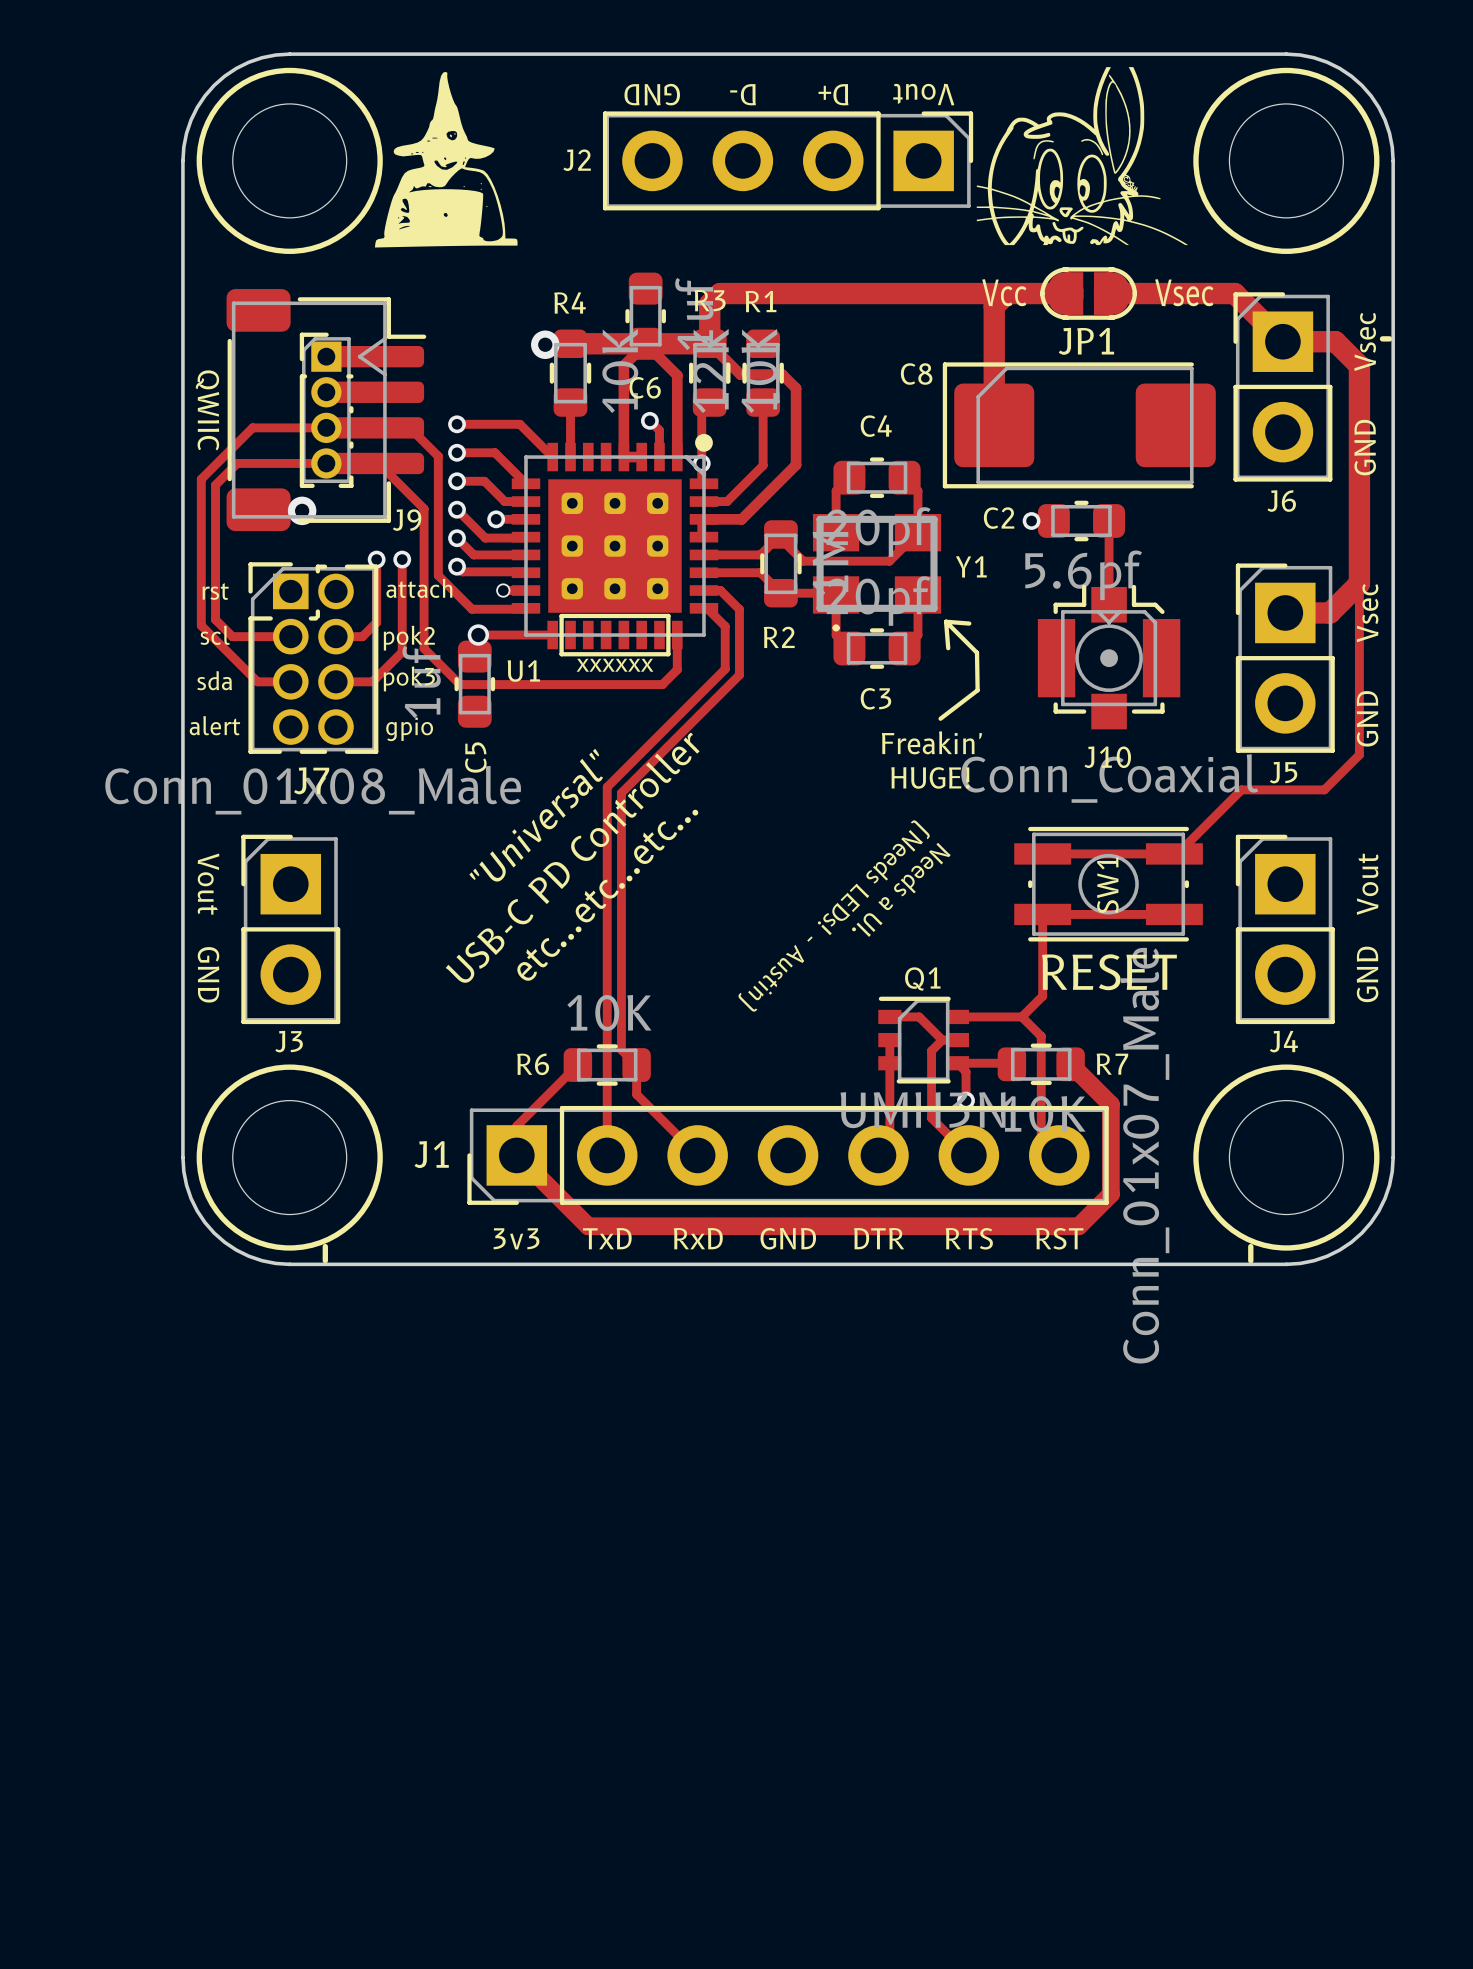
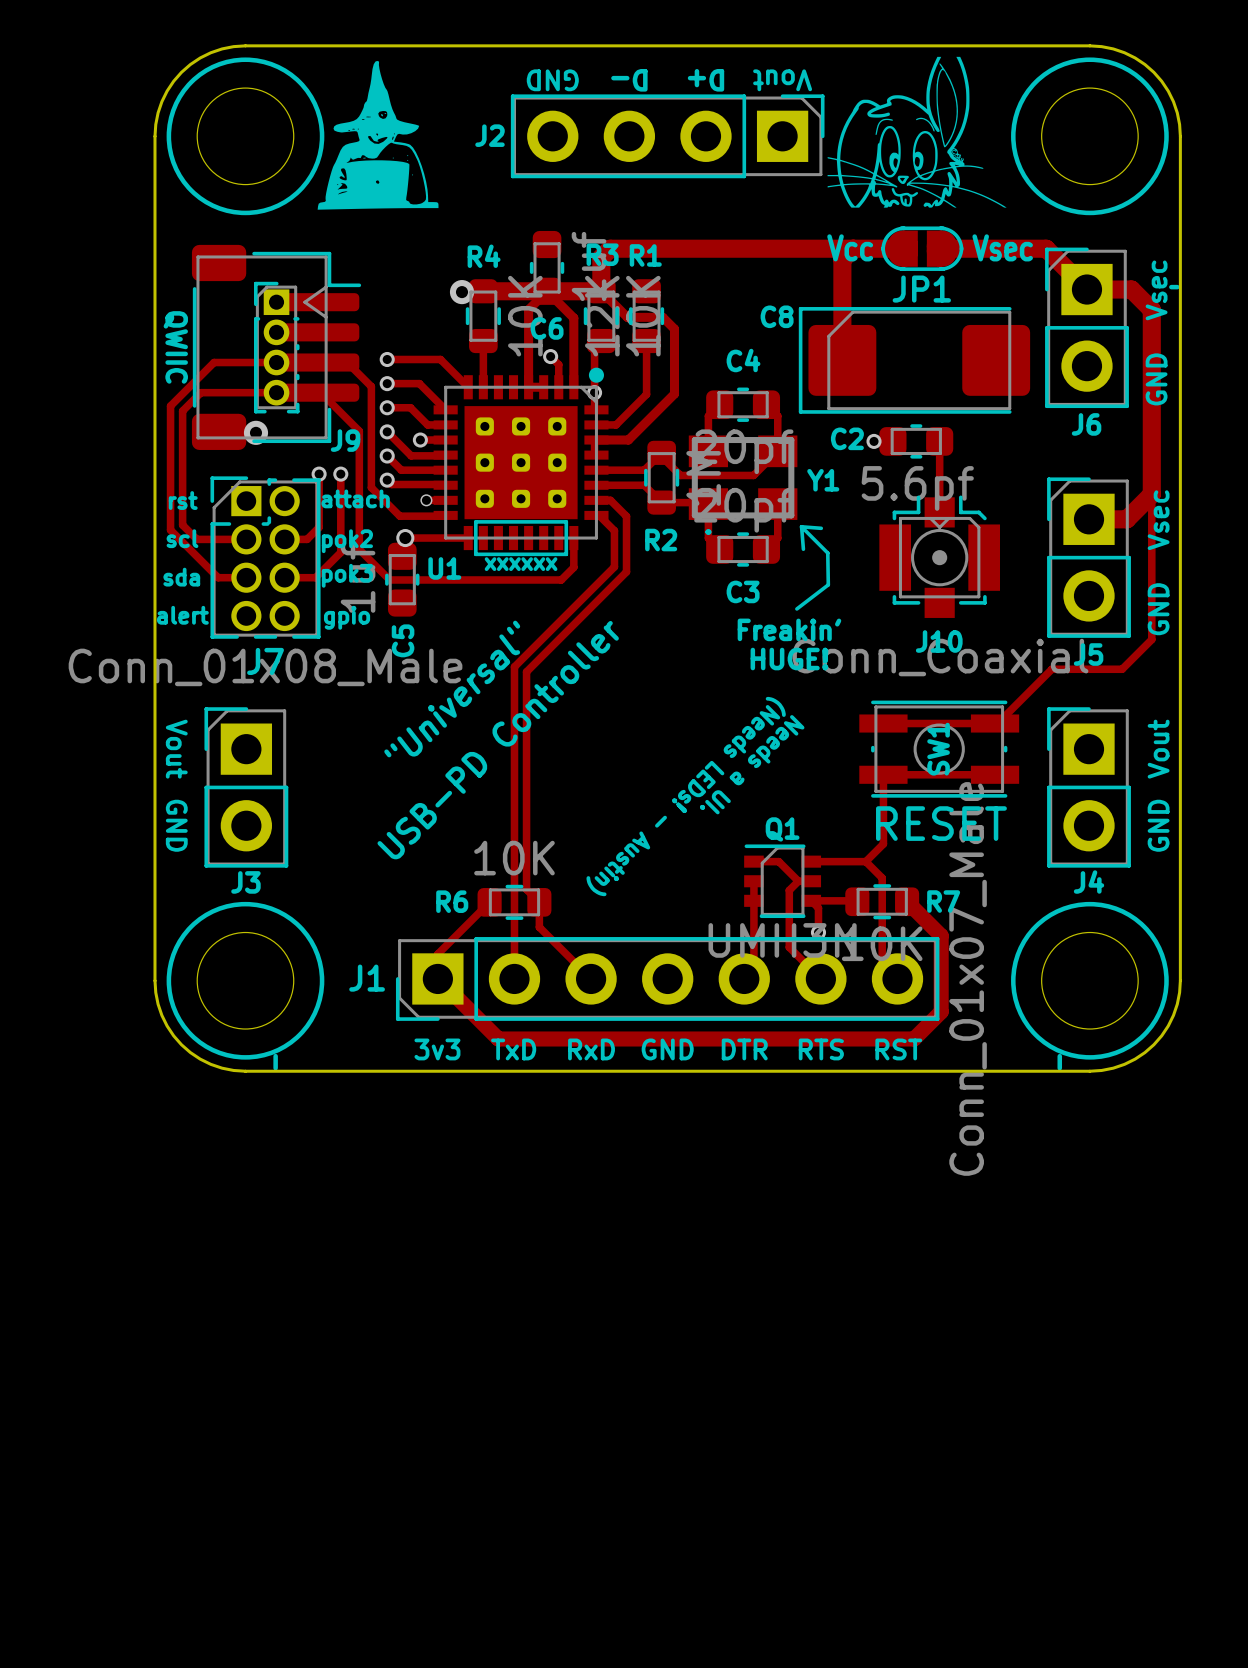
text: USB-C PD Controller (572, 857) -> USB-PD Controller (498, 740)
text: etc...etc...etc... (607, 895) -> none

